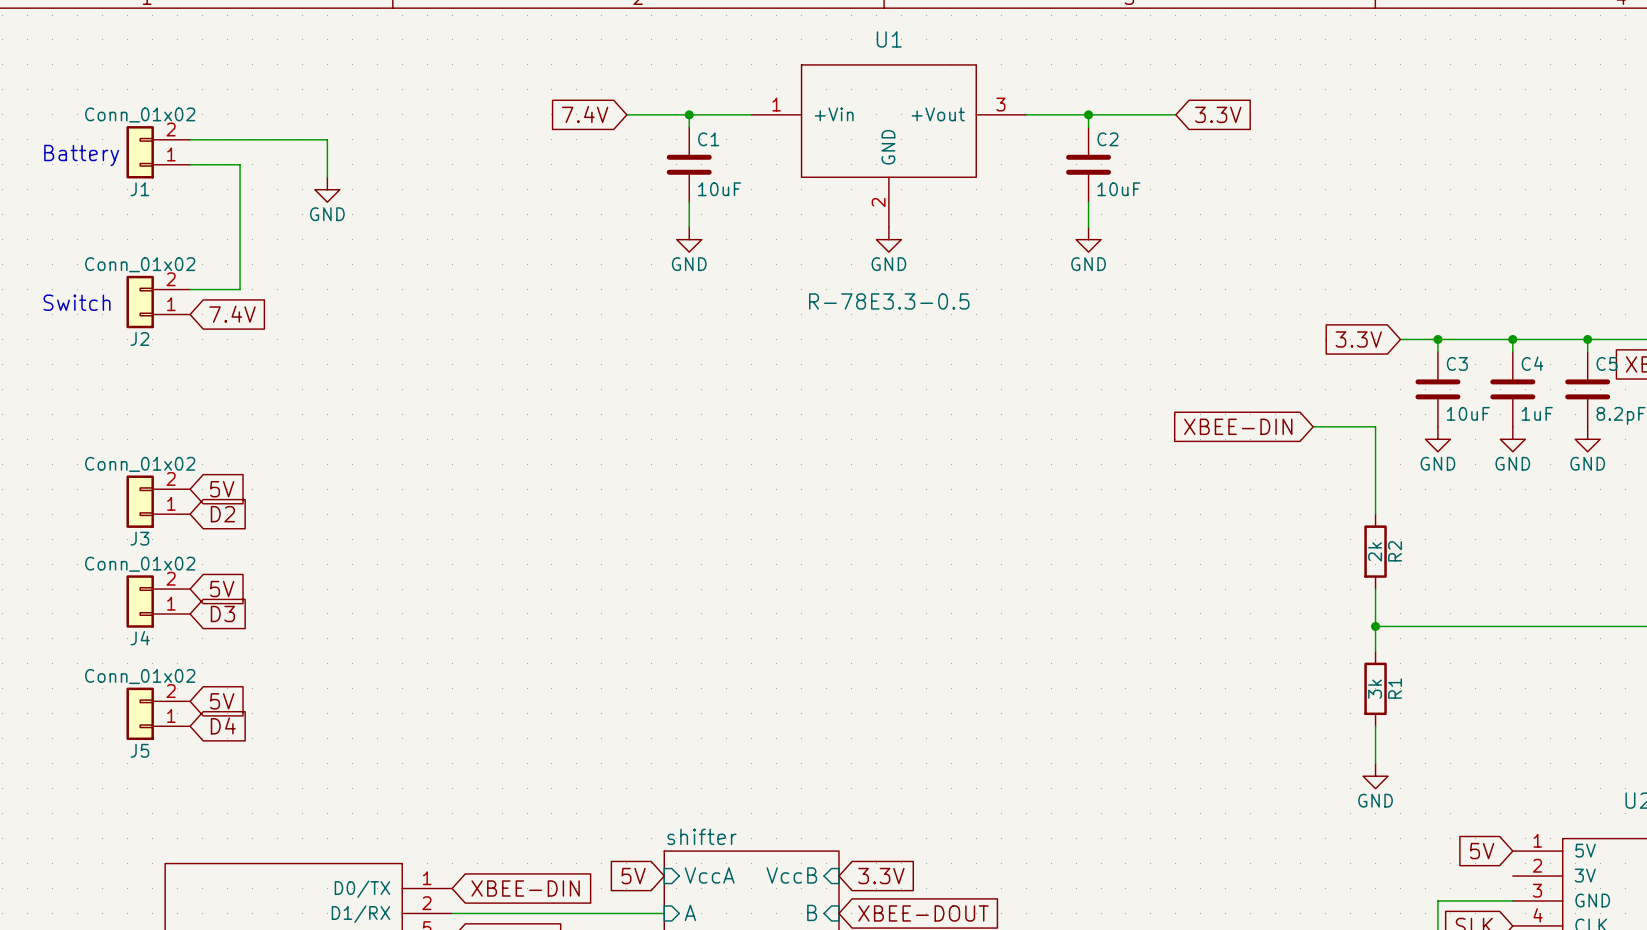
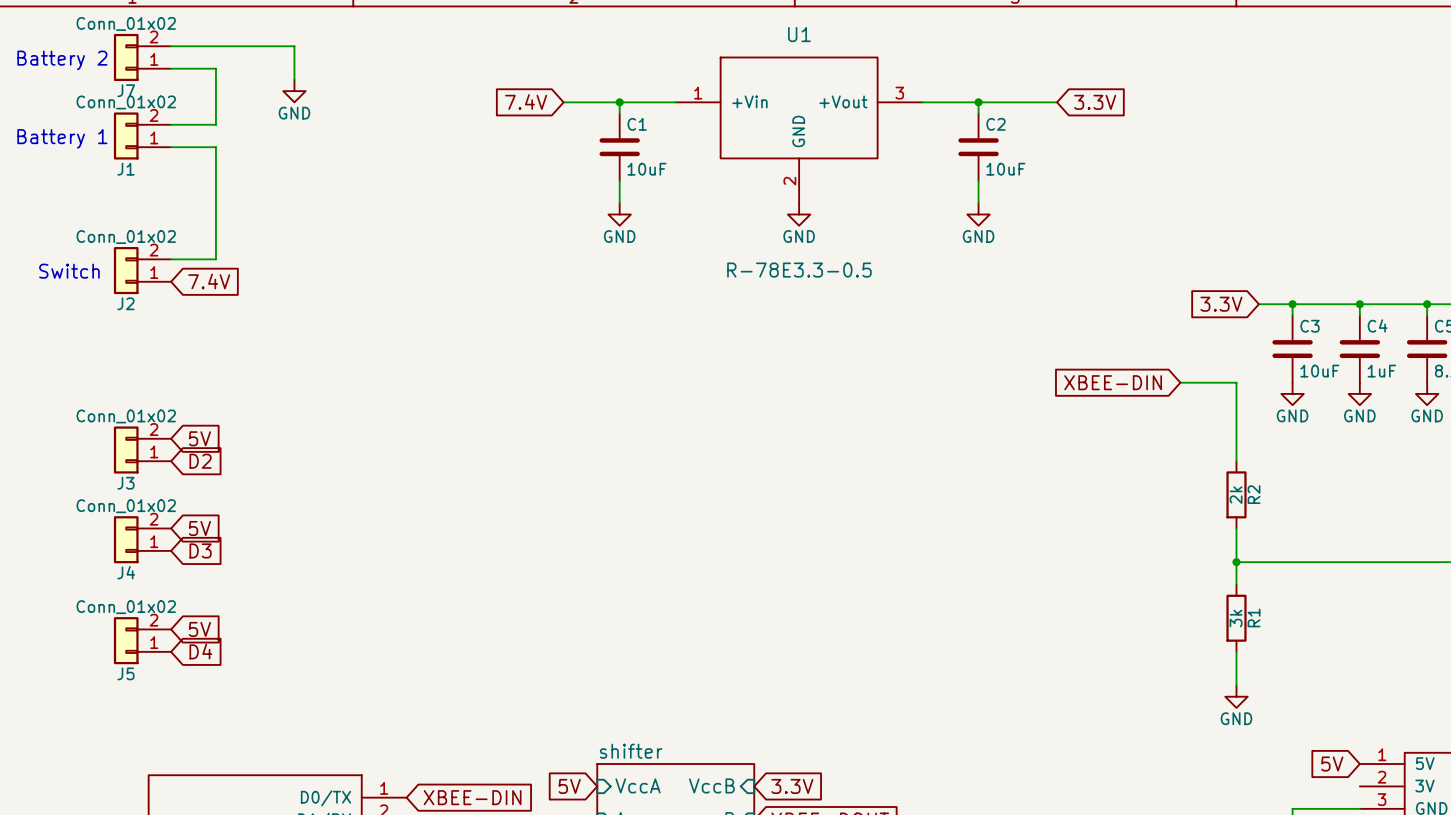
wire: none -> (171, 46) (294, 46) (294, 79)
J7: none -> Conn_01x02 (142, 57)
text: none -> Battery 2 (62, 60)
wire: (240, 139) (327, 139) (327, 177) -> (215, 124) (215, 68) (171, 68)
text: Battery (81, 155) -> Battery 1 (62, 138)
power symbol position: GND (327, 189) -> GND (294, 91)

